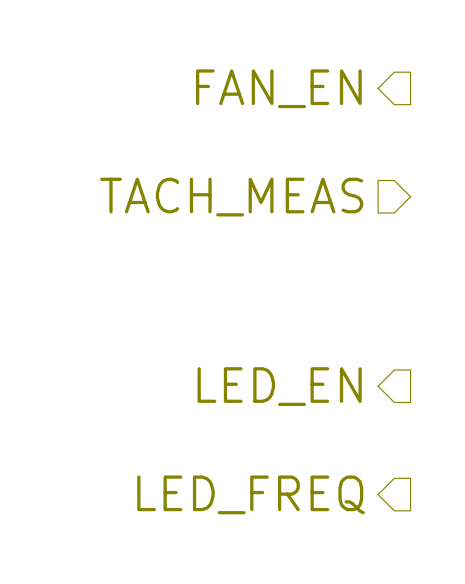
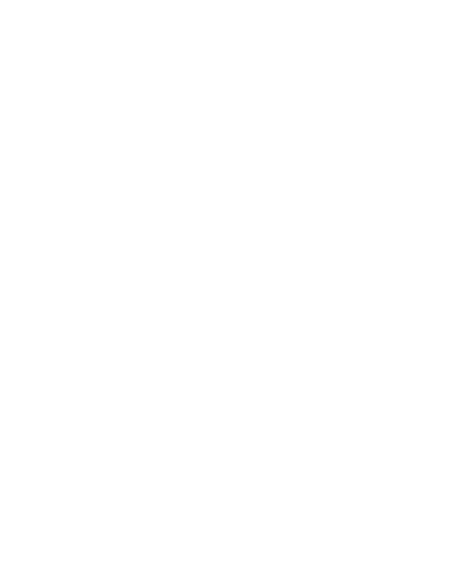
hierarchical label: FAN_EN (278, 88) -> none
hierarchical label: TACH_MEAS (231, 197) -> none
hierarchical label: LED_EN (279, 386) -> none
hierarchical label: LED_FREQ (251, 494) -> none

